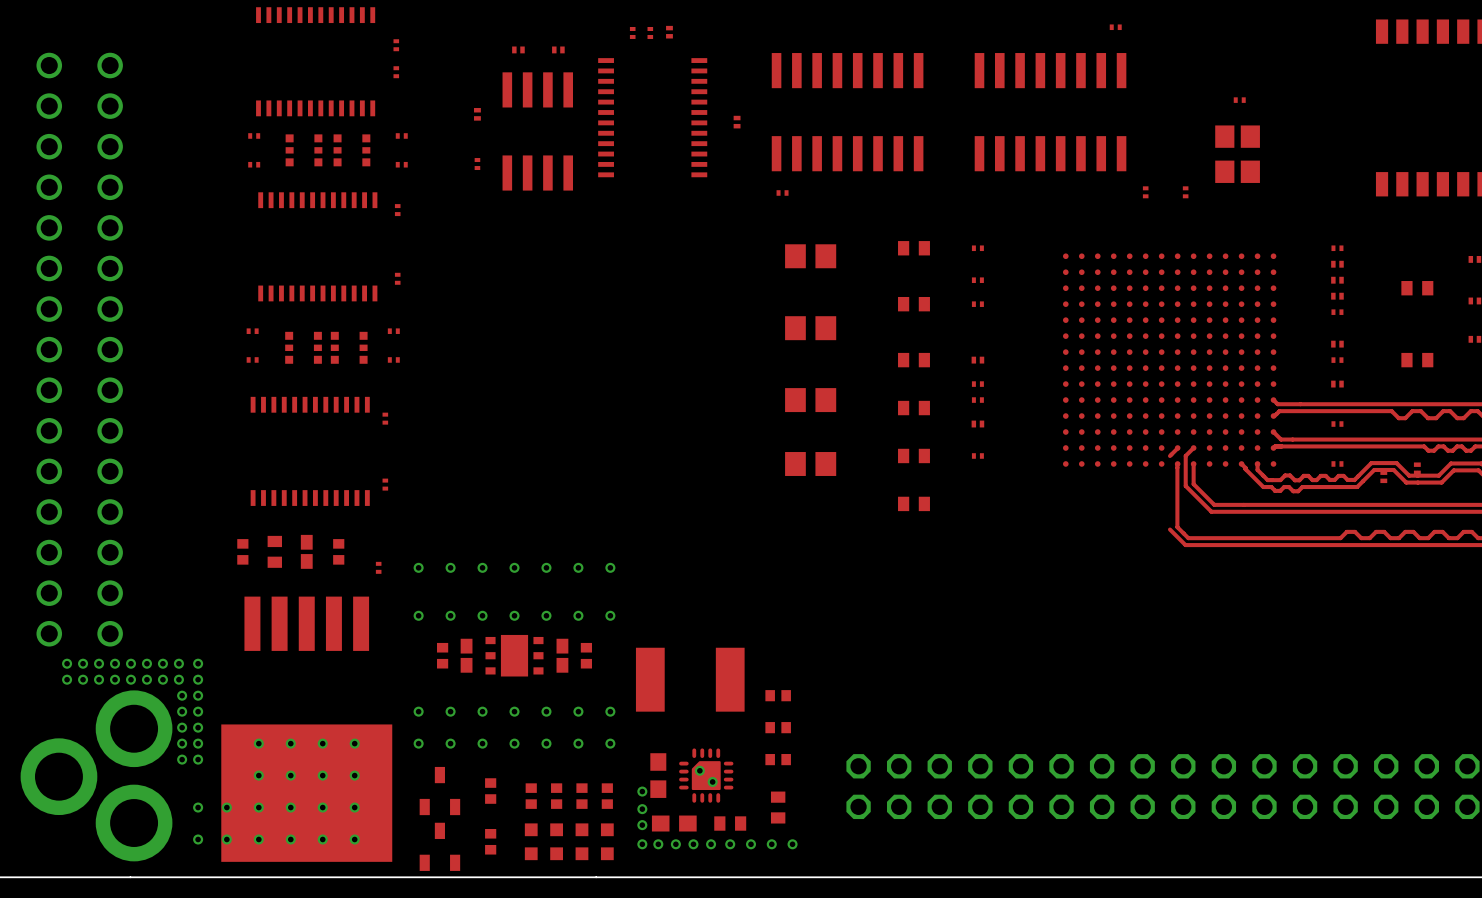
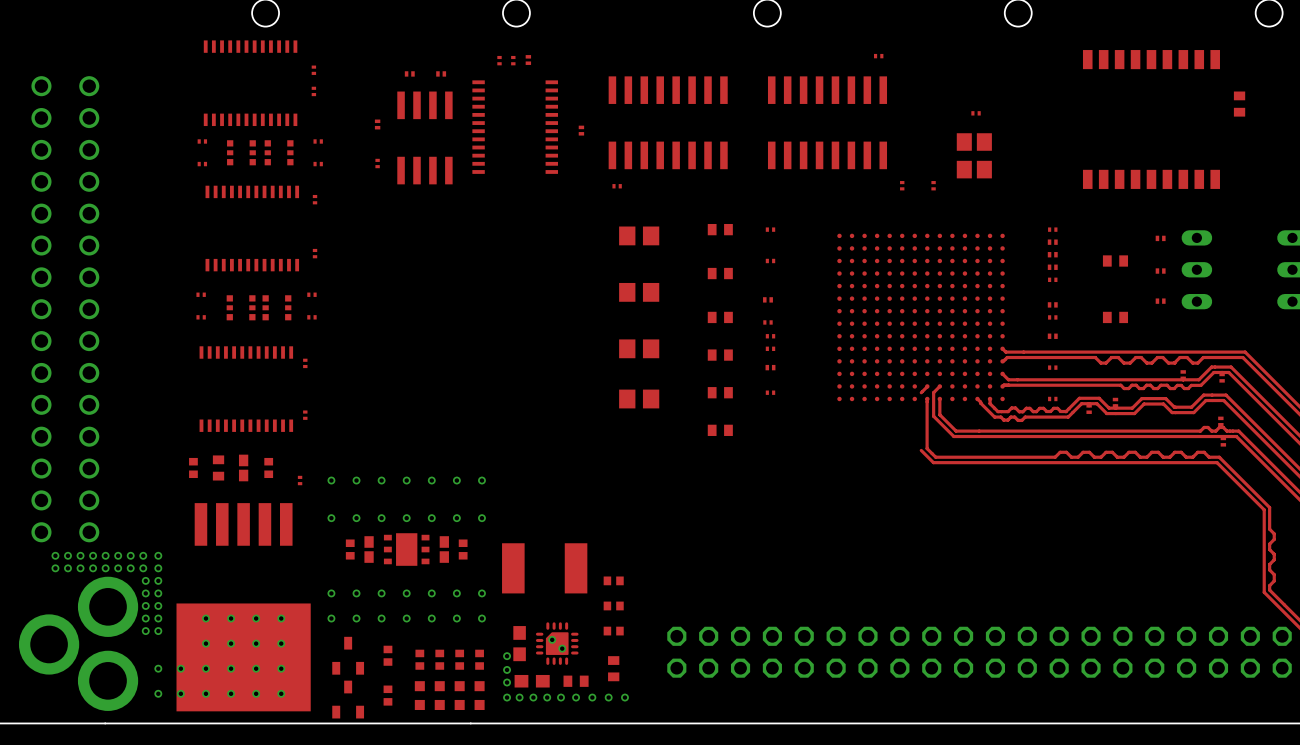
part: (977, 280) -> none
part: none -> (770, 260)
part: (977, 304) -> none
part: none -> (767, 299)
part footprint: [971, 356, 985, 364] -> [763, 320, 773, 325]

